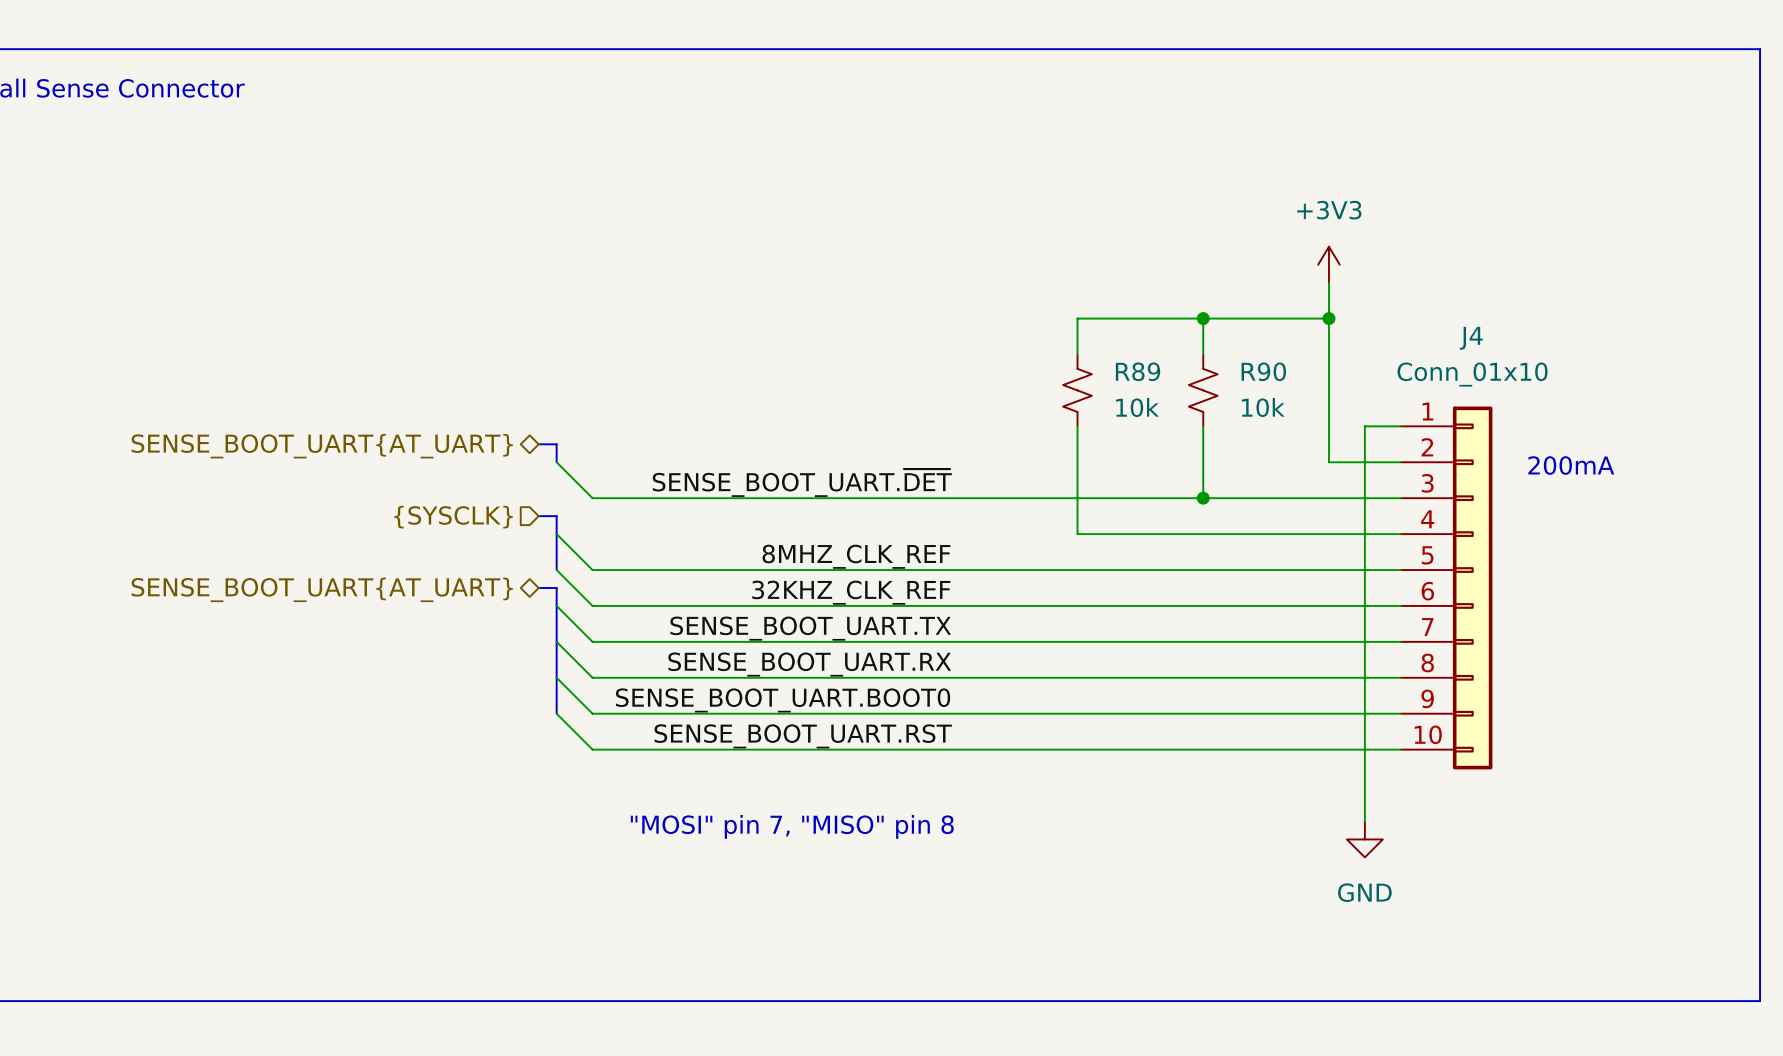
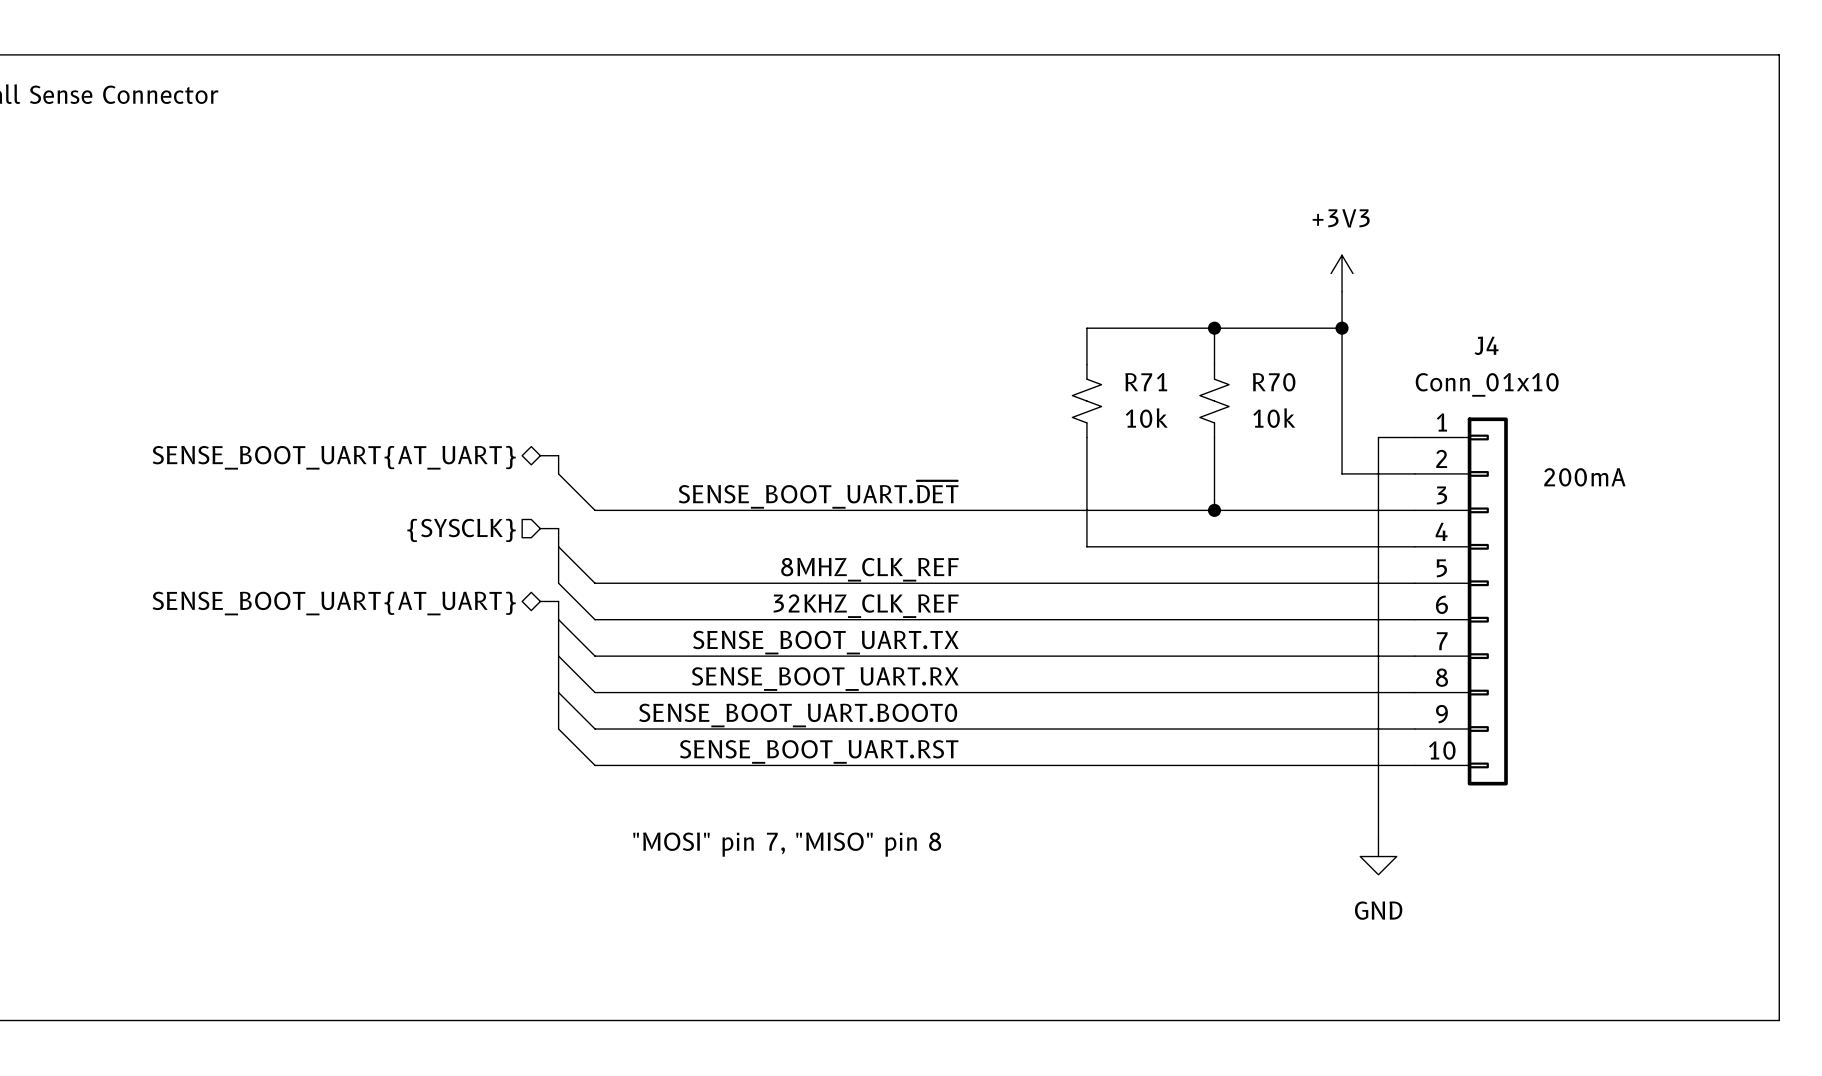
R89 name: R89 (1138, 371) -> R71 (1146, 382)
R90 name: R90 (1263, 371) -> R70 (1274, 382)

